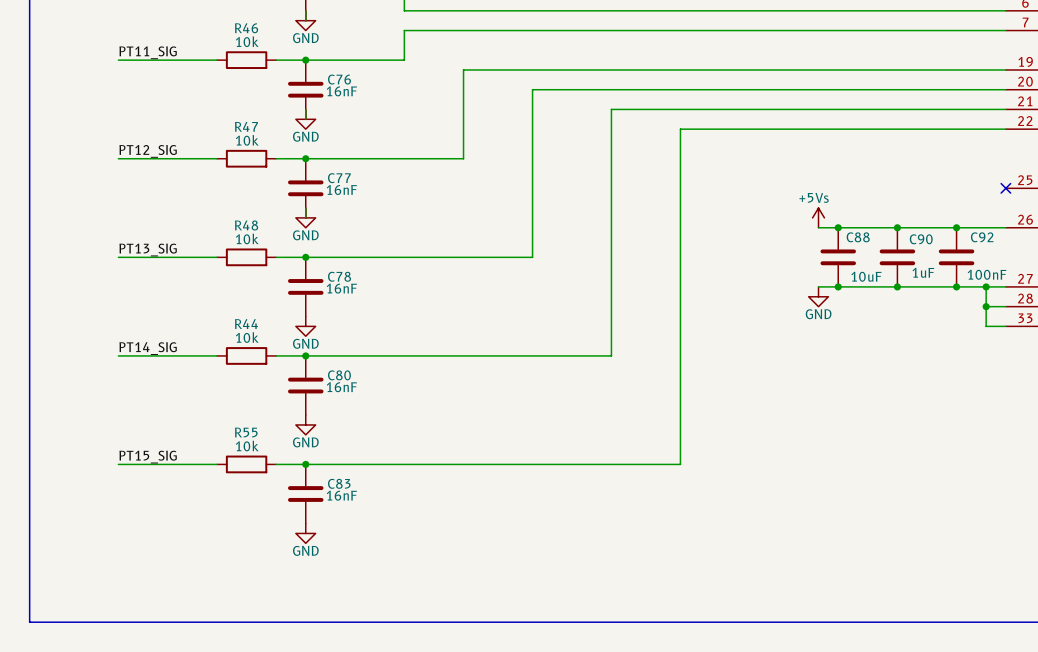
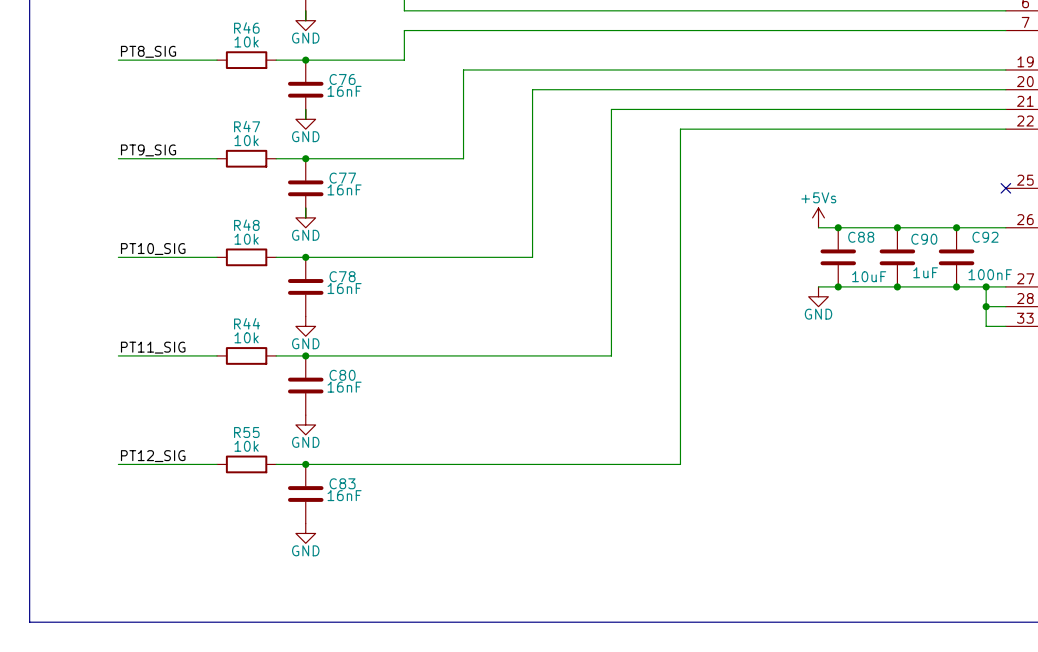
label: PT11_SIG (148, 52) -> PT8_SIG (148, 51)
label: PT12_SIG (148, 151) -> PT9_SIG (148, 150)
label: PT13_SIG (148, 250) -> PT10_SIG (153, 249)
label: PT14_SIG (148, 348) -> PT11_SIG (153, 347)
label: PT15_SIG (148, 457) -> PT12_SIG (153, 456)

